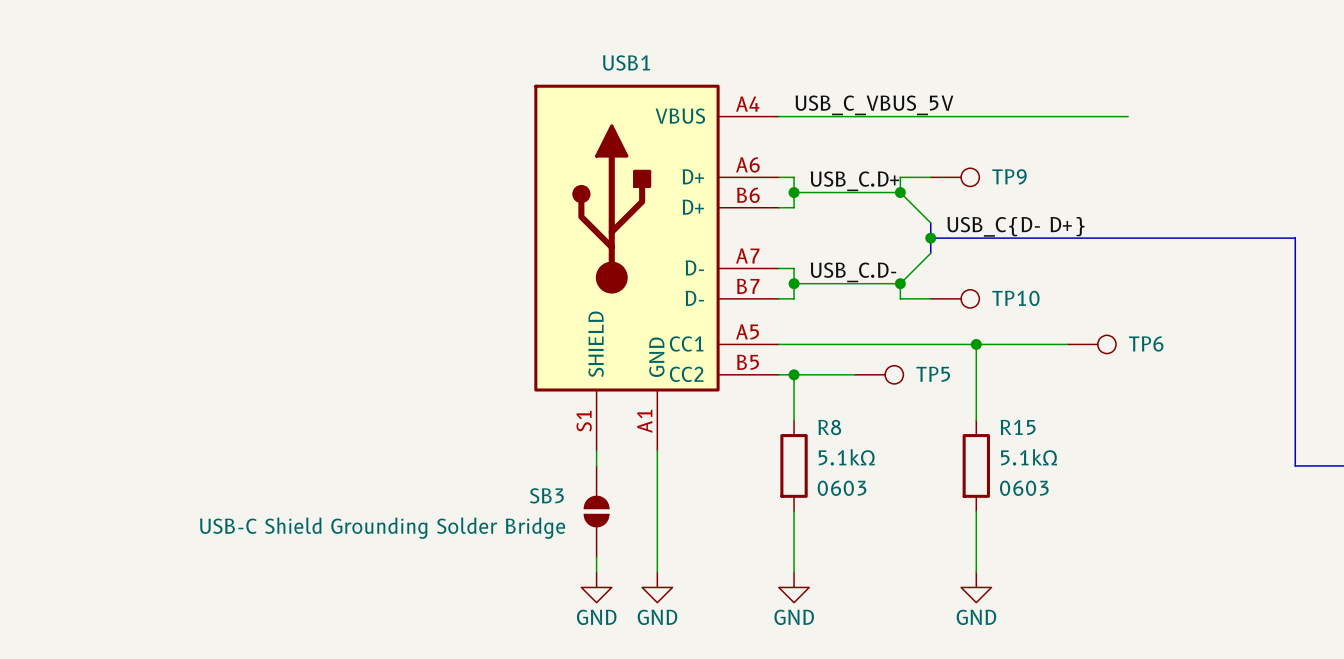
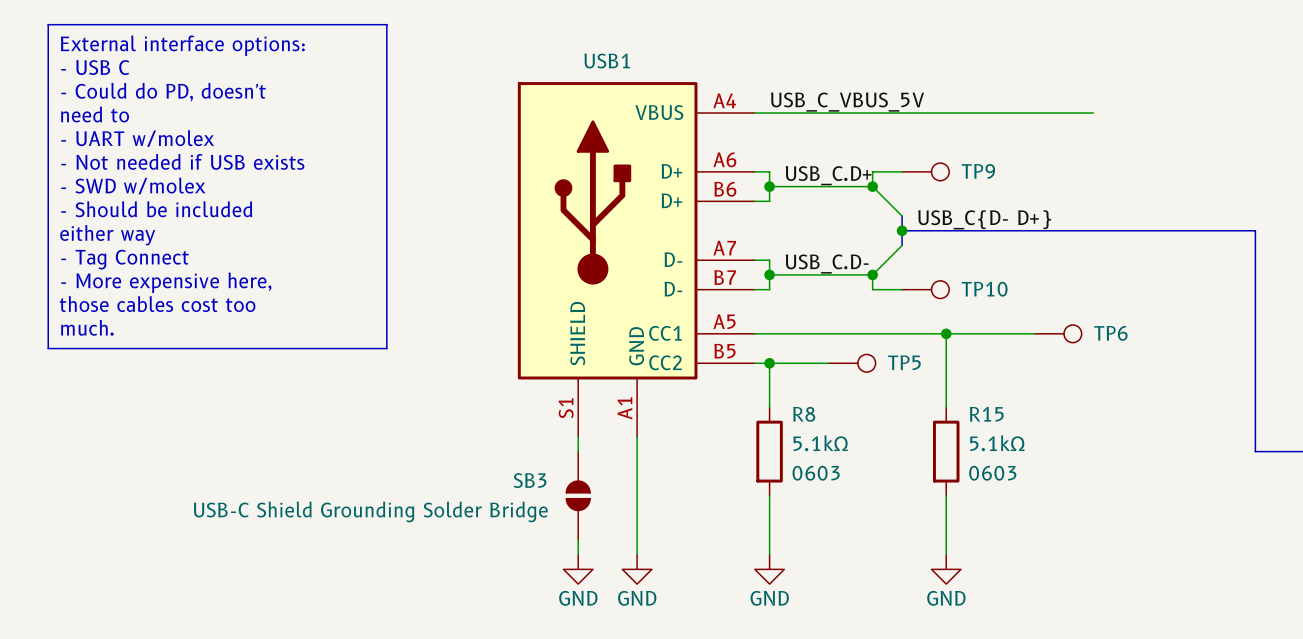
line: none -> (48, 24) (386, 24) (386, 348) (48, 348) (48, 24)
text: none -> External interface options: (182, 45)
text: none -> - USB C (95, 67)
text: none -> - Could do PD, doesn't (163, 92)
text: none -> need to (95, 114)
text: none -> - UART w/molex (137, 138)
text: none -> - Not needed if USB exists (182, 161)
text: none -> - SWD w/molex (133, 185)
text: none -> - Should be included (156, 209)
text: none -> either way (107, 235)
text: none -> - Tag Connect (125, 259)
text: none -> - More expensive here, (166, 282)
text: none -> those cables cost too (157, 304)
text: none -> much. (87, 327)

